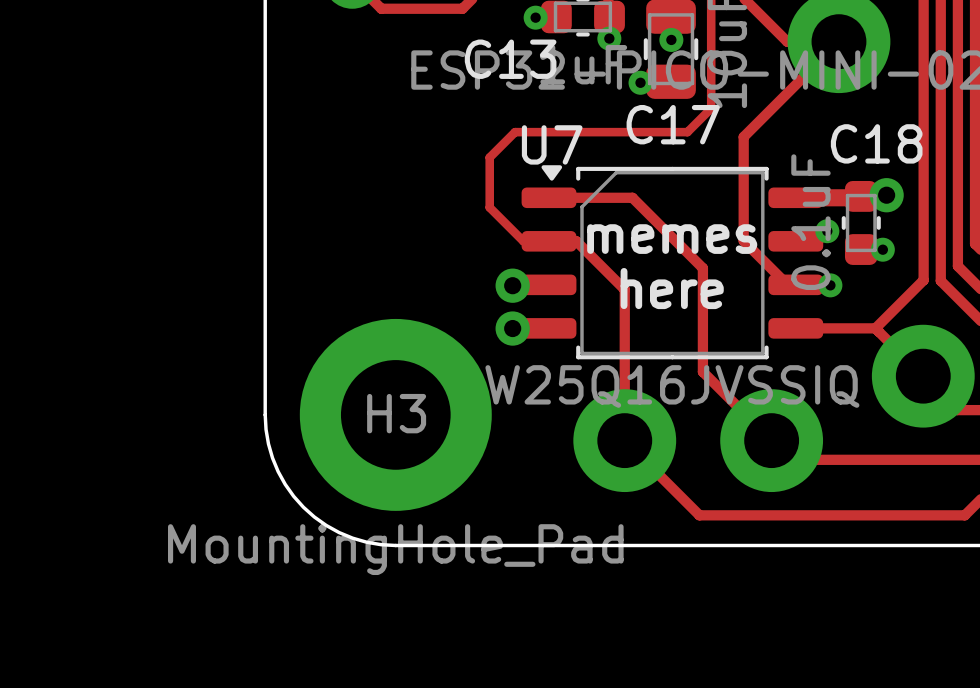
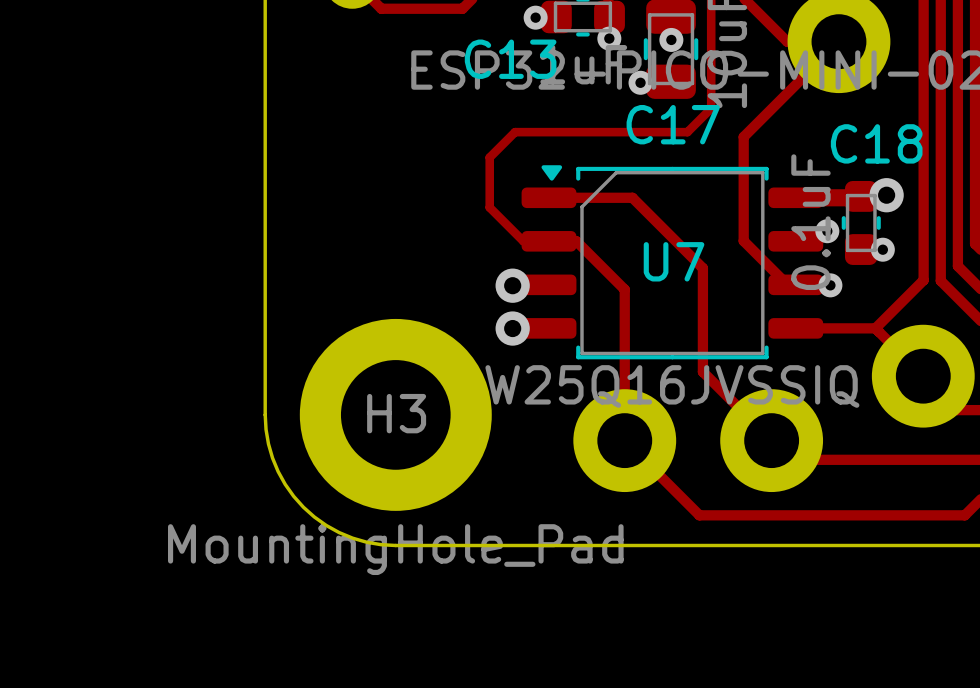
U7 name position: U7 (552, 144) -> U7 (674, 261)
text: memes (672, 239) -> none
text: here (672, 288) -> none

